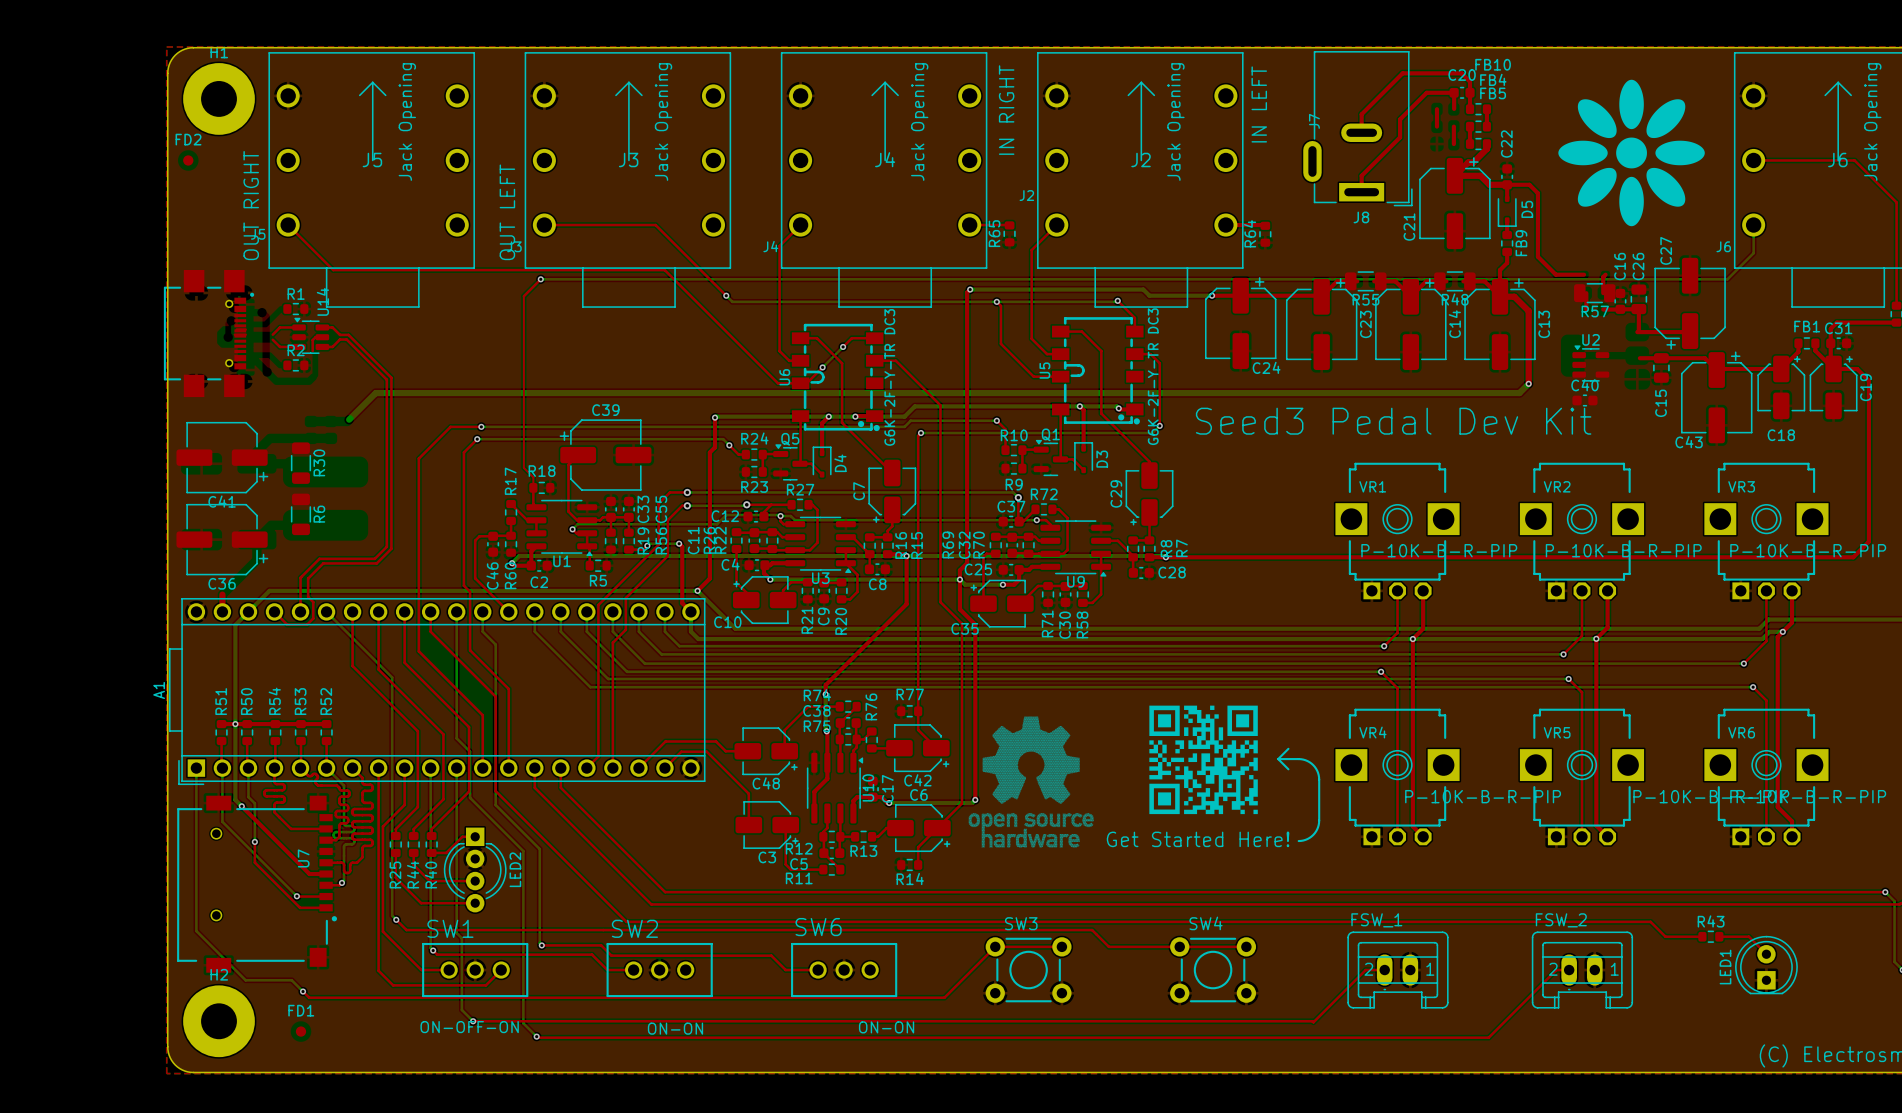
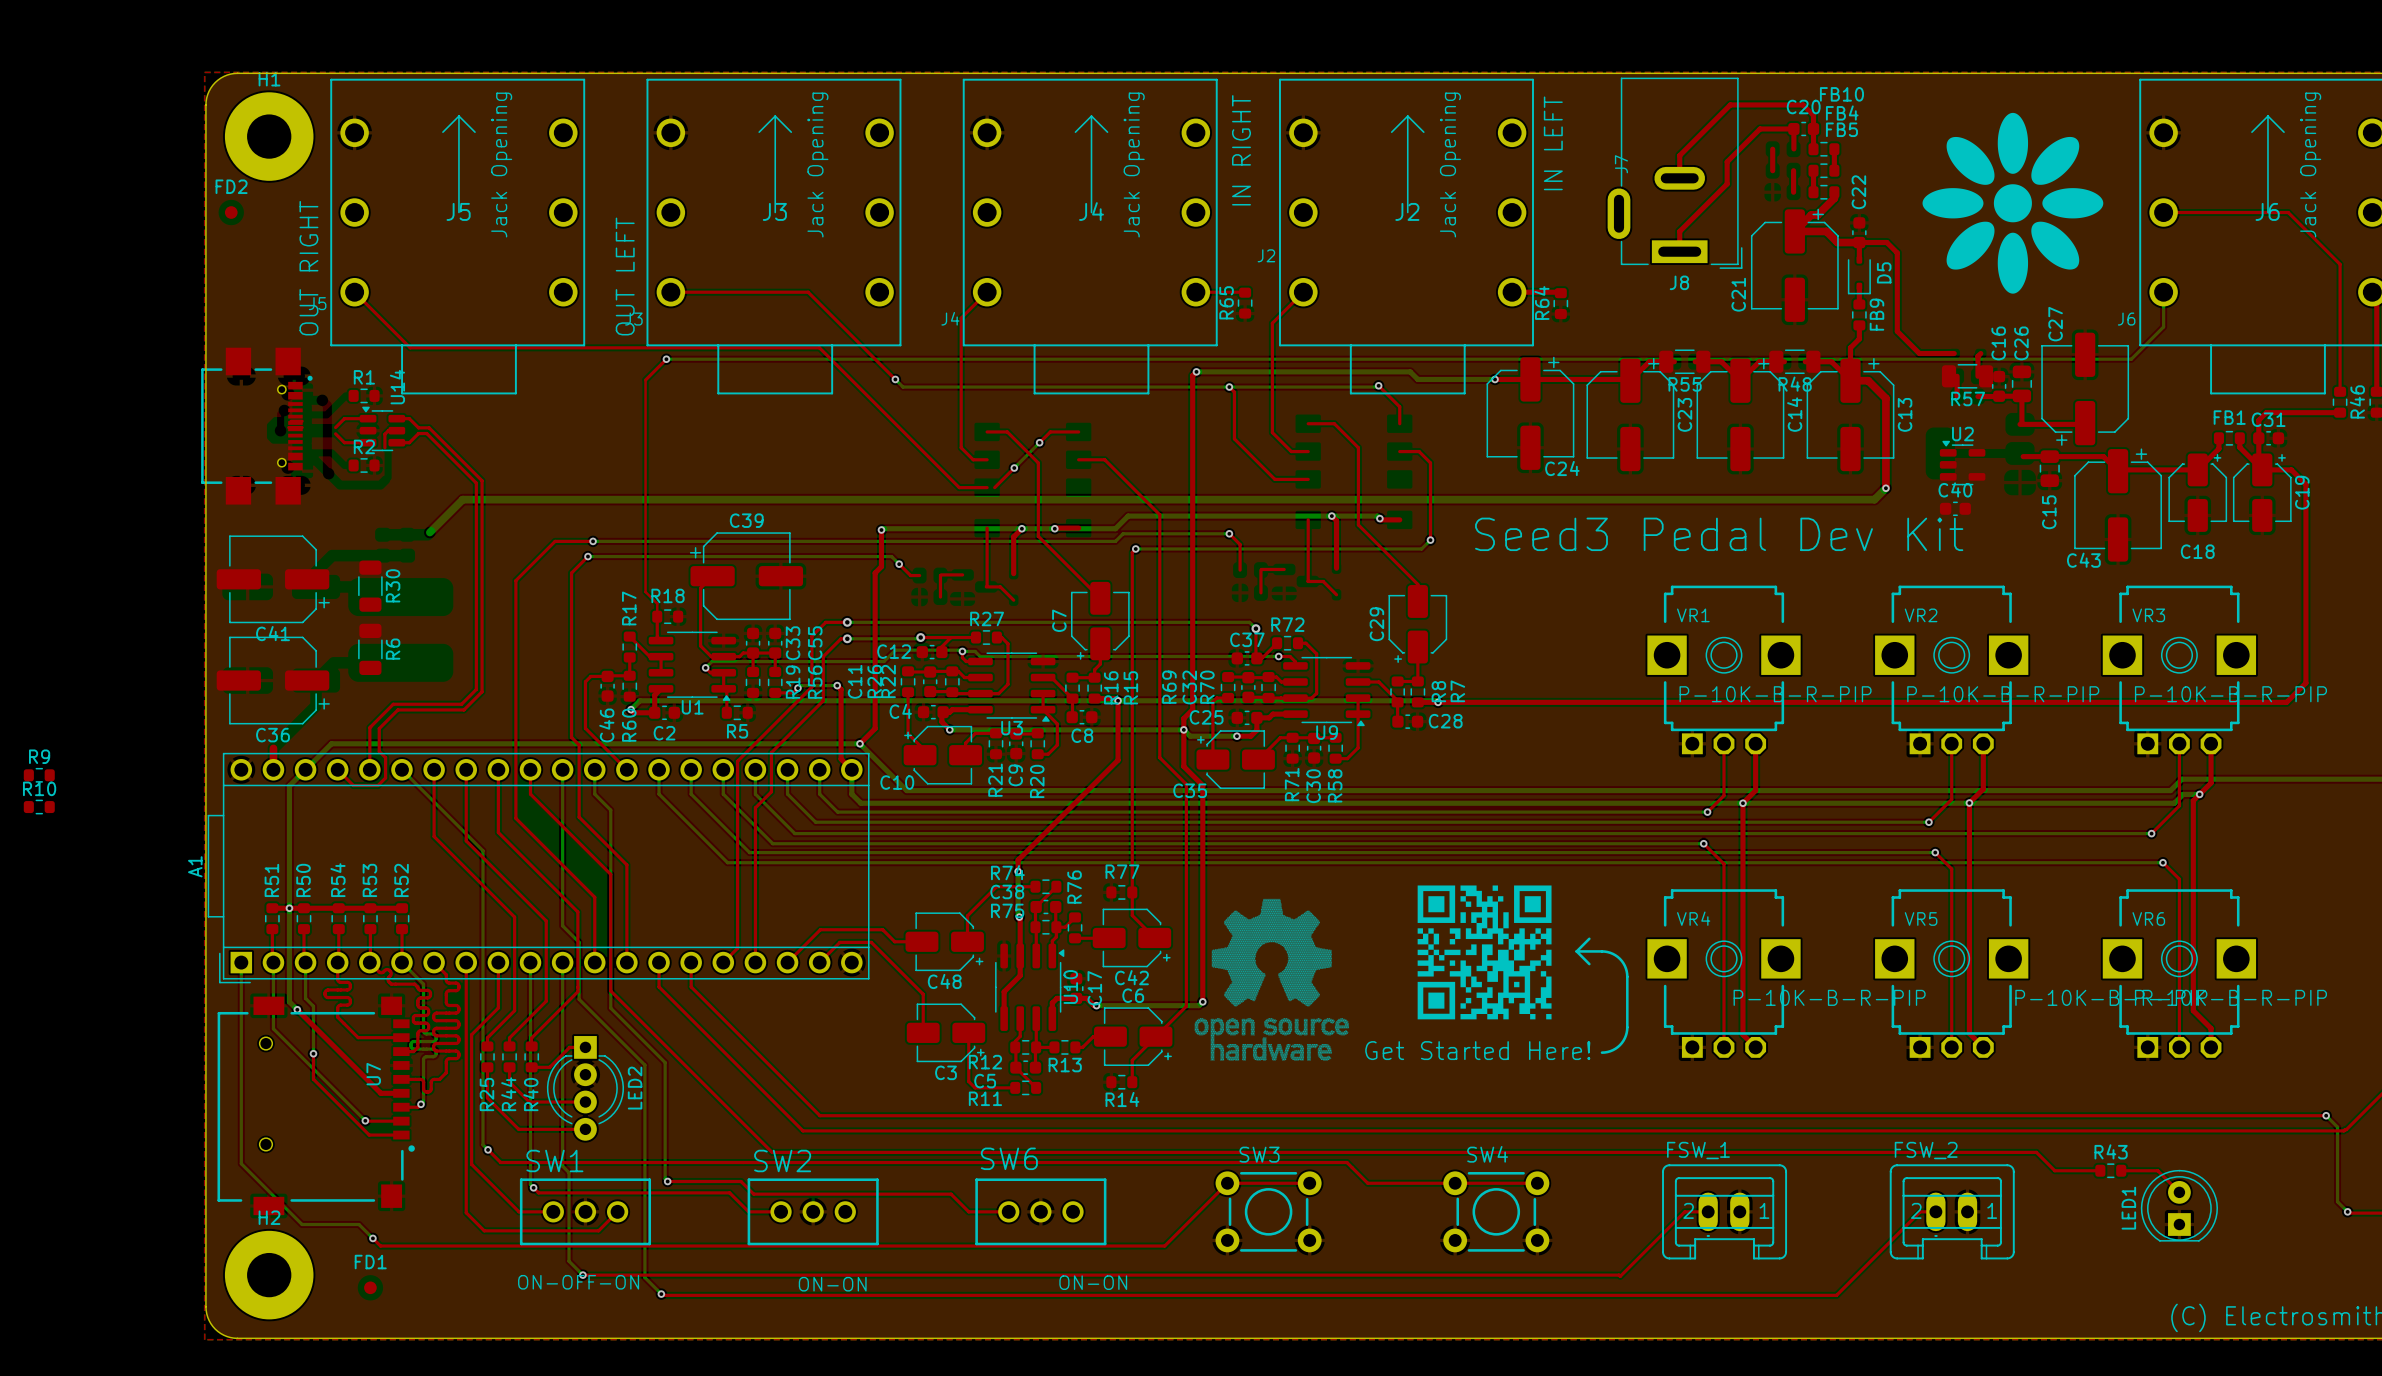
U5: G6K-2F-Y-TR DC3 (1097, 370) -> none
U6: G6K-2F-Y-TR DC3 (837, 377) -> none
R10 position: (1013, 450) -> (39, 807)
R24: (754, 454) -> none
Q1: (1050, 457) -> none
D3: (1083, 457) -> none
Q5: (790, 462) -> none
D4: (822, 462) -> none
R9 position: (1013, 468) -> (39, 775)
R23: (754, 471) -> none
R9 name position: R9 (1014, 484) -> R9 (39, 756)

